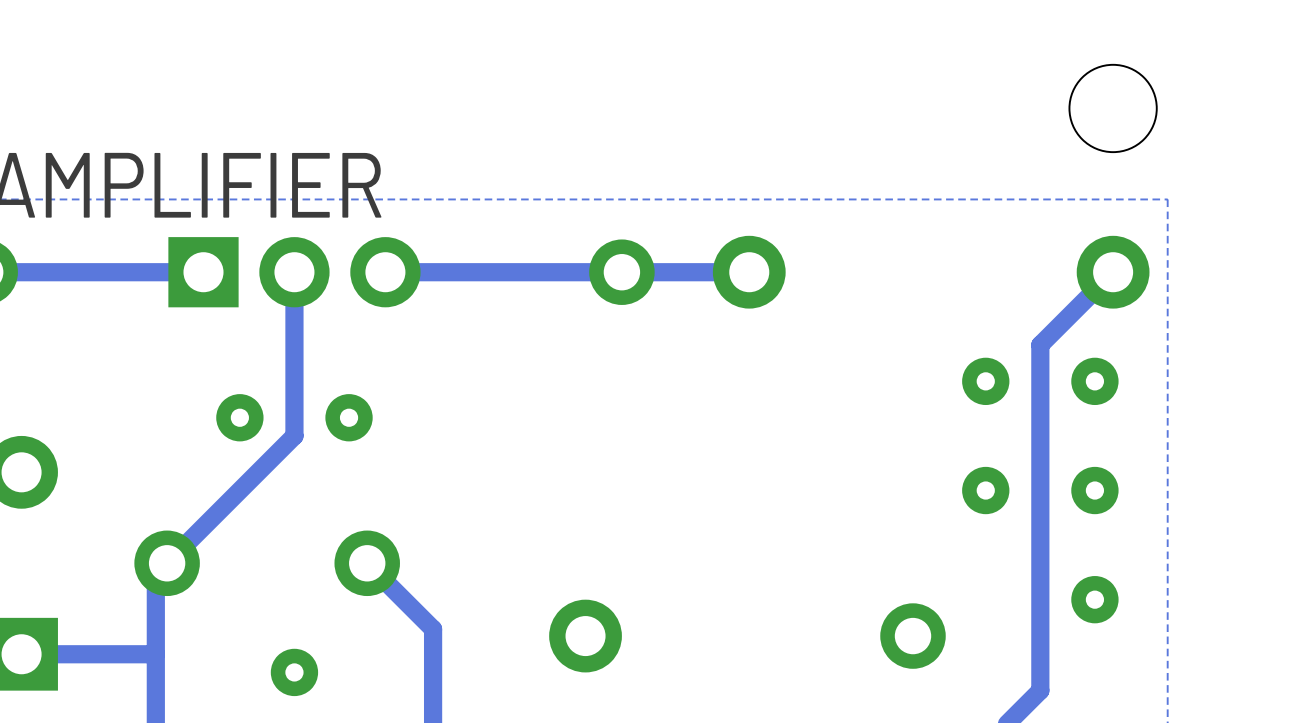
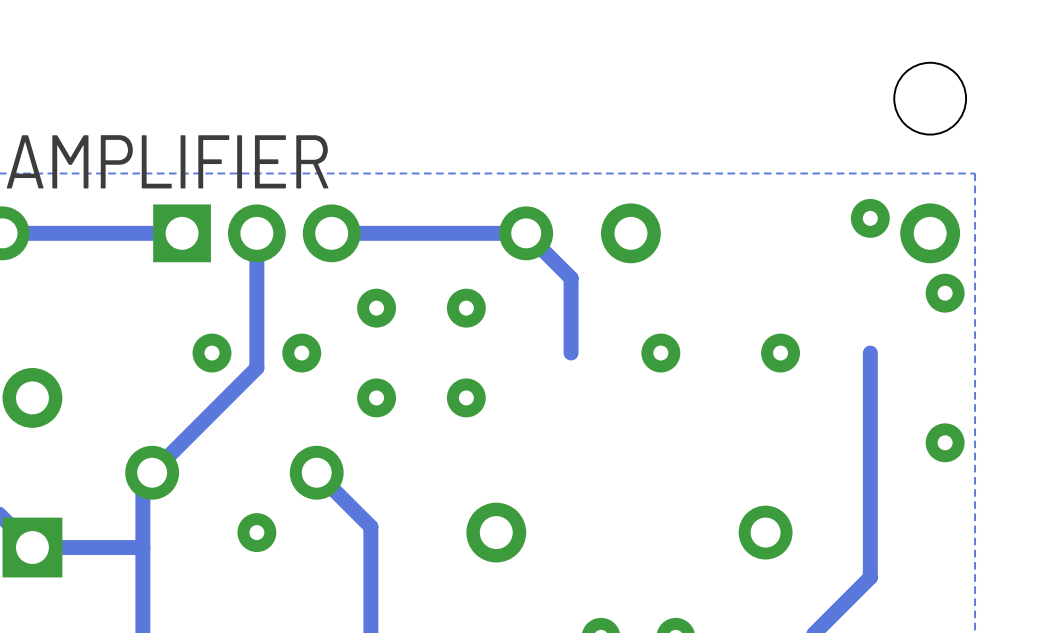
via: none -> (870, 218)
track: (749, 272) (621, 272) -> (571, 353) (571, 278) (526, 233)
track: (1113, 272) (1040, 344) (1040, 417) -> none
via: none -> (376, 308)
via: none -> (466, 308)
via: (985, 381) -> none
via position: (1094, 381) -> (945, 293)
via: none -> (660, 353)
via: none -> (780, 353)
via: none -> (376, 397)
via: none -> (466, 397)
via: (985, 490) -> none
via: (1094, 490) -> none
via: none -> (945, 442)
via: (1094, 599) -> none
via position: (294, 672) -> (256, 532)

